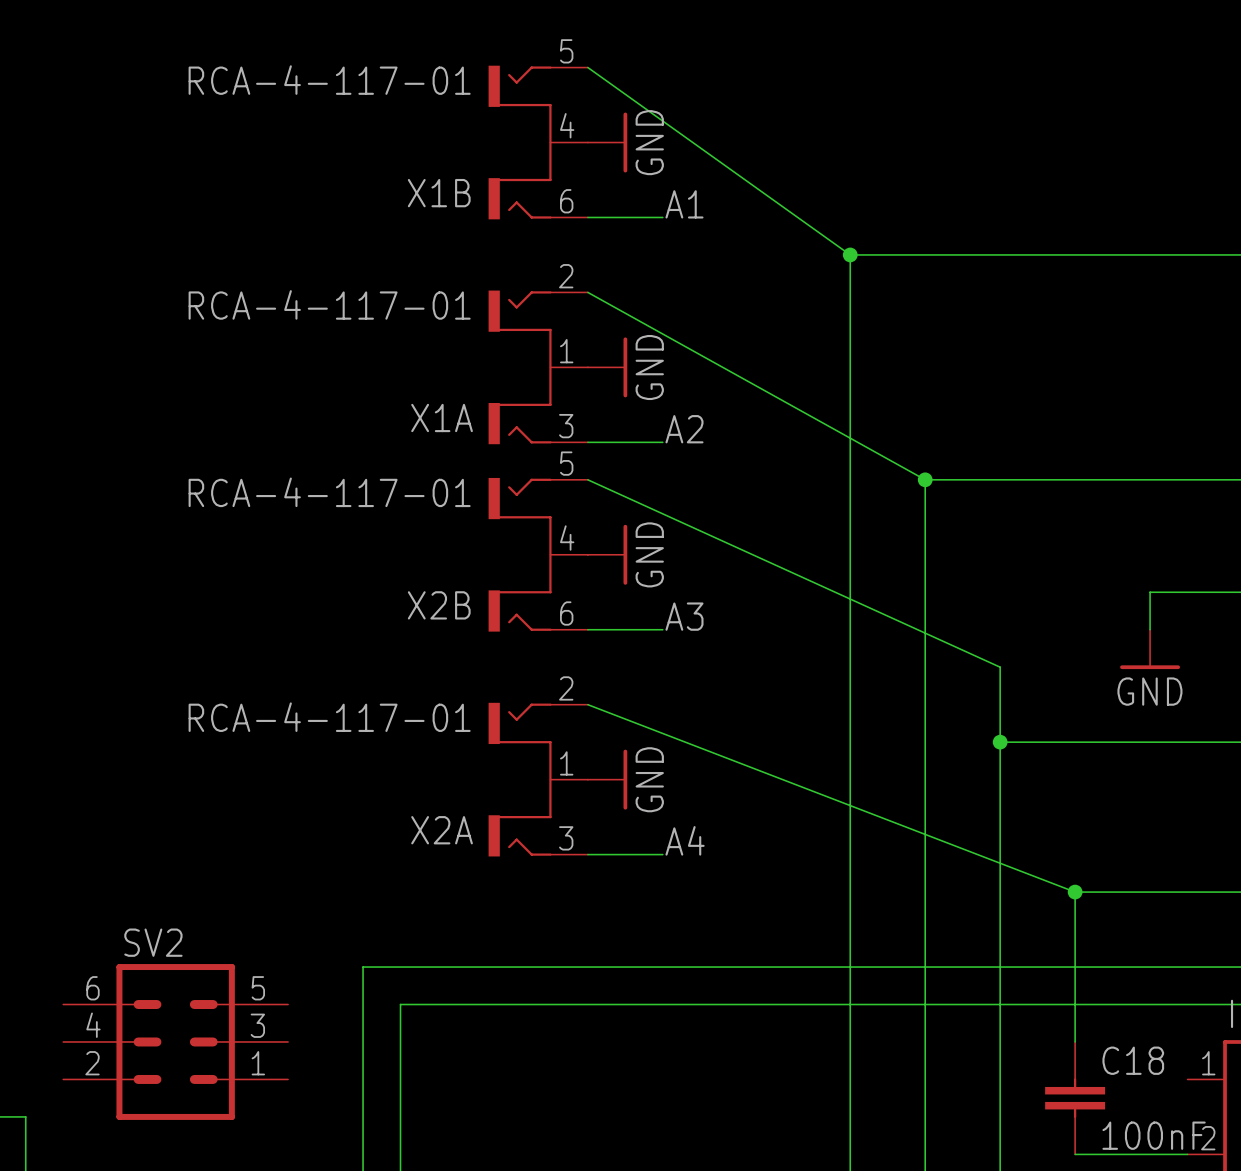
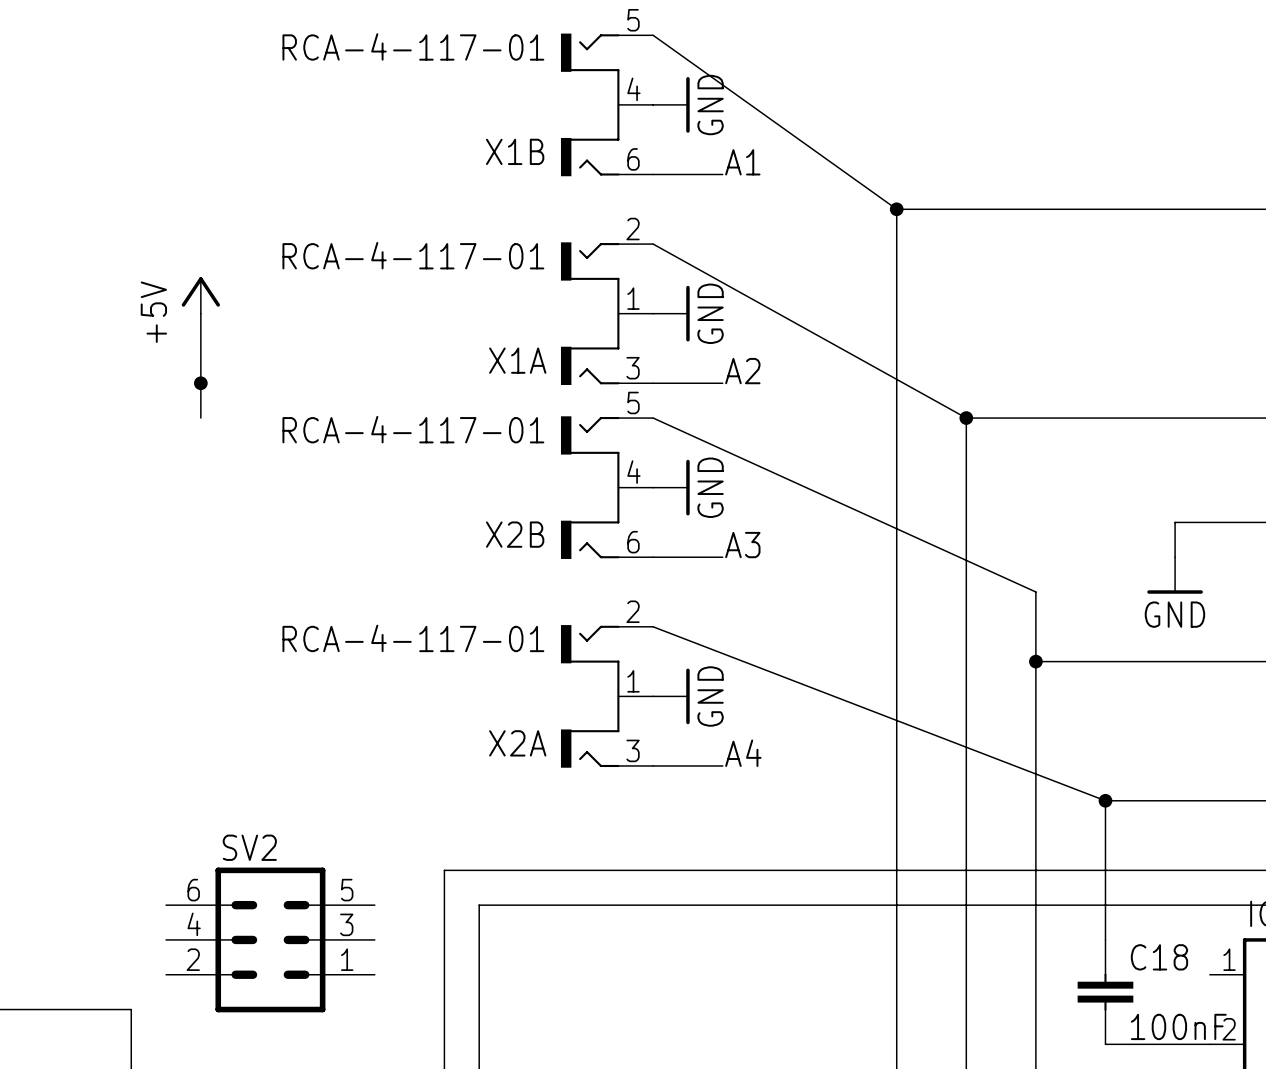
power symbol: none -> +5V (200, 295)
wire: none -> (200, 313) (200, 418)
junction: none -> (200, 383)

